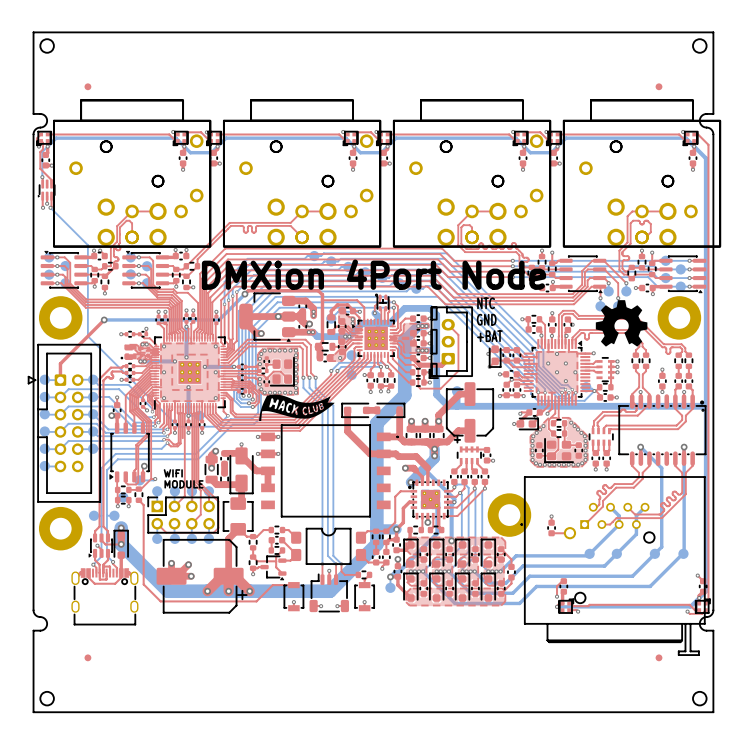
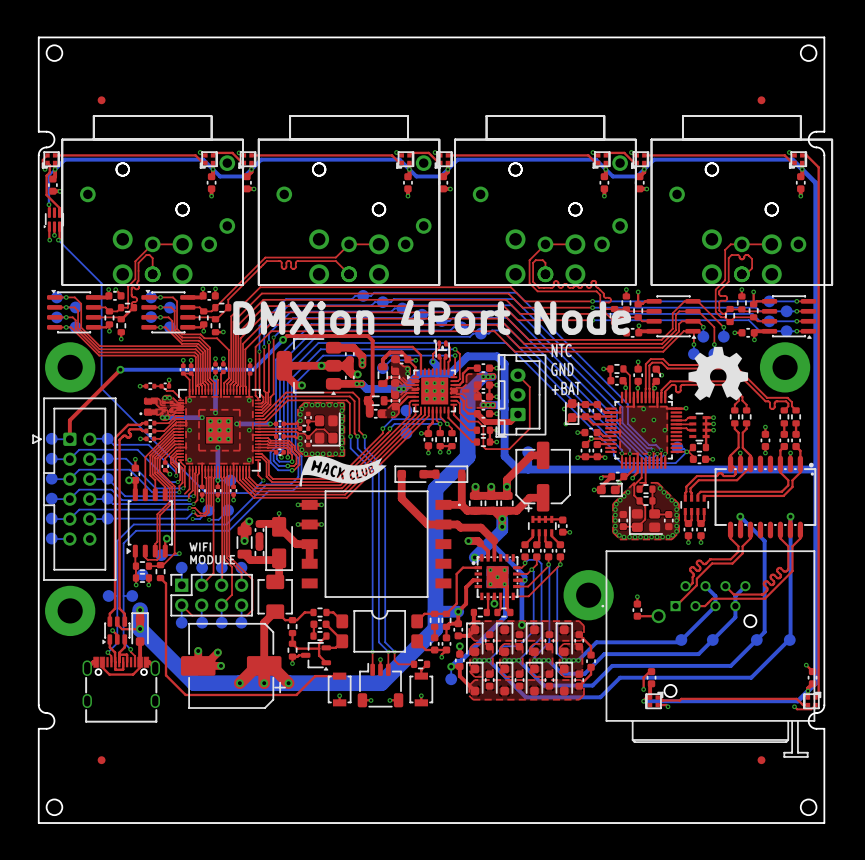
bottom track: none -> (208, 510) (199, 519) (192, 519)
part: none -> (208, 510)
bottom track: none -> (228, 510) (218, 519) (209, 519)
part: none -> (228, 510)
via: none -> (192, 519)
via: none -> (209, 519)

